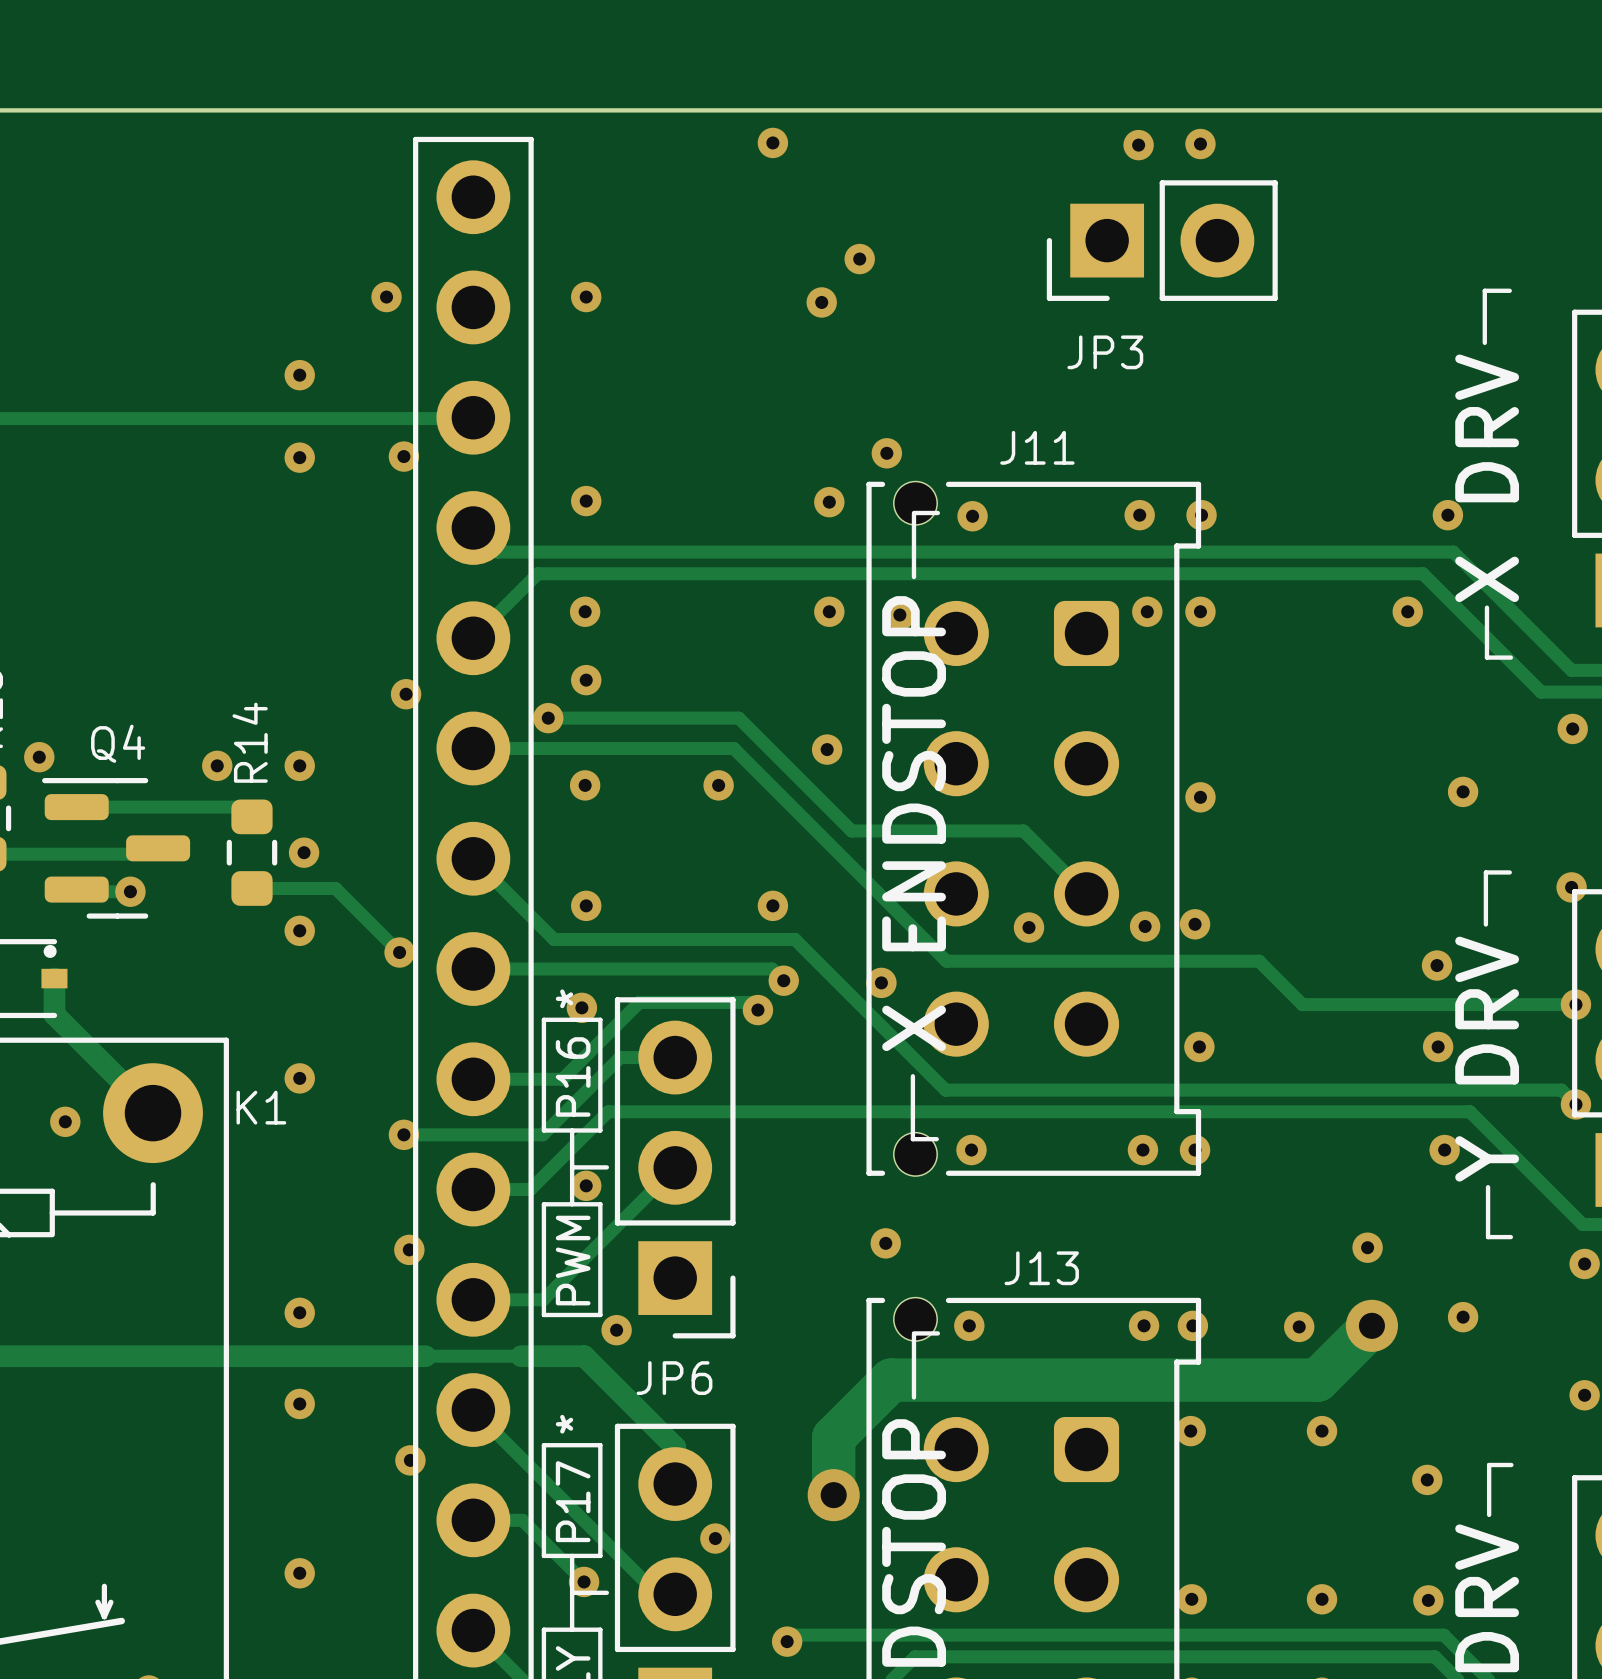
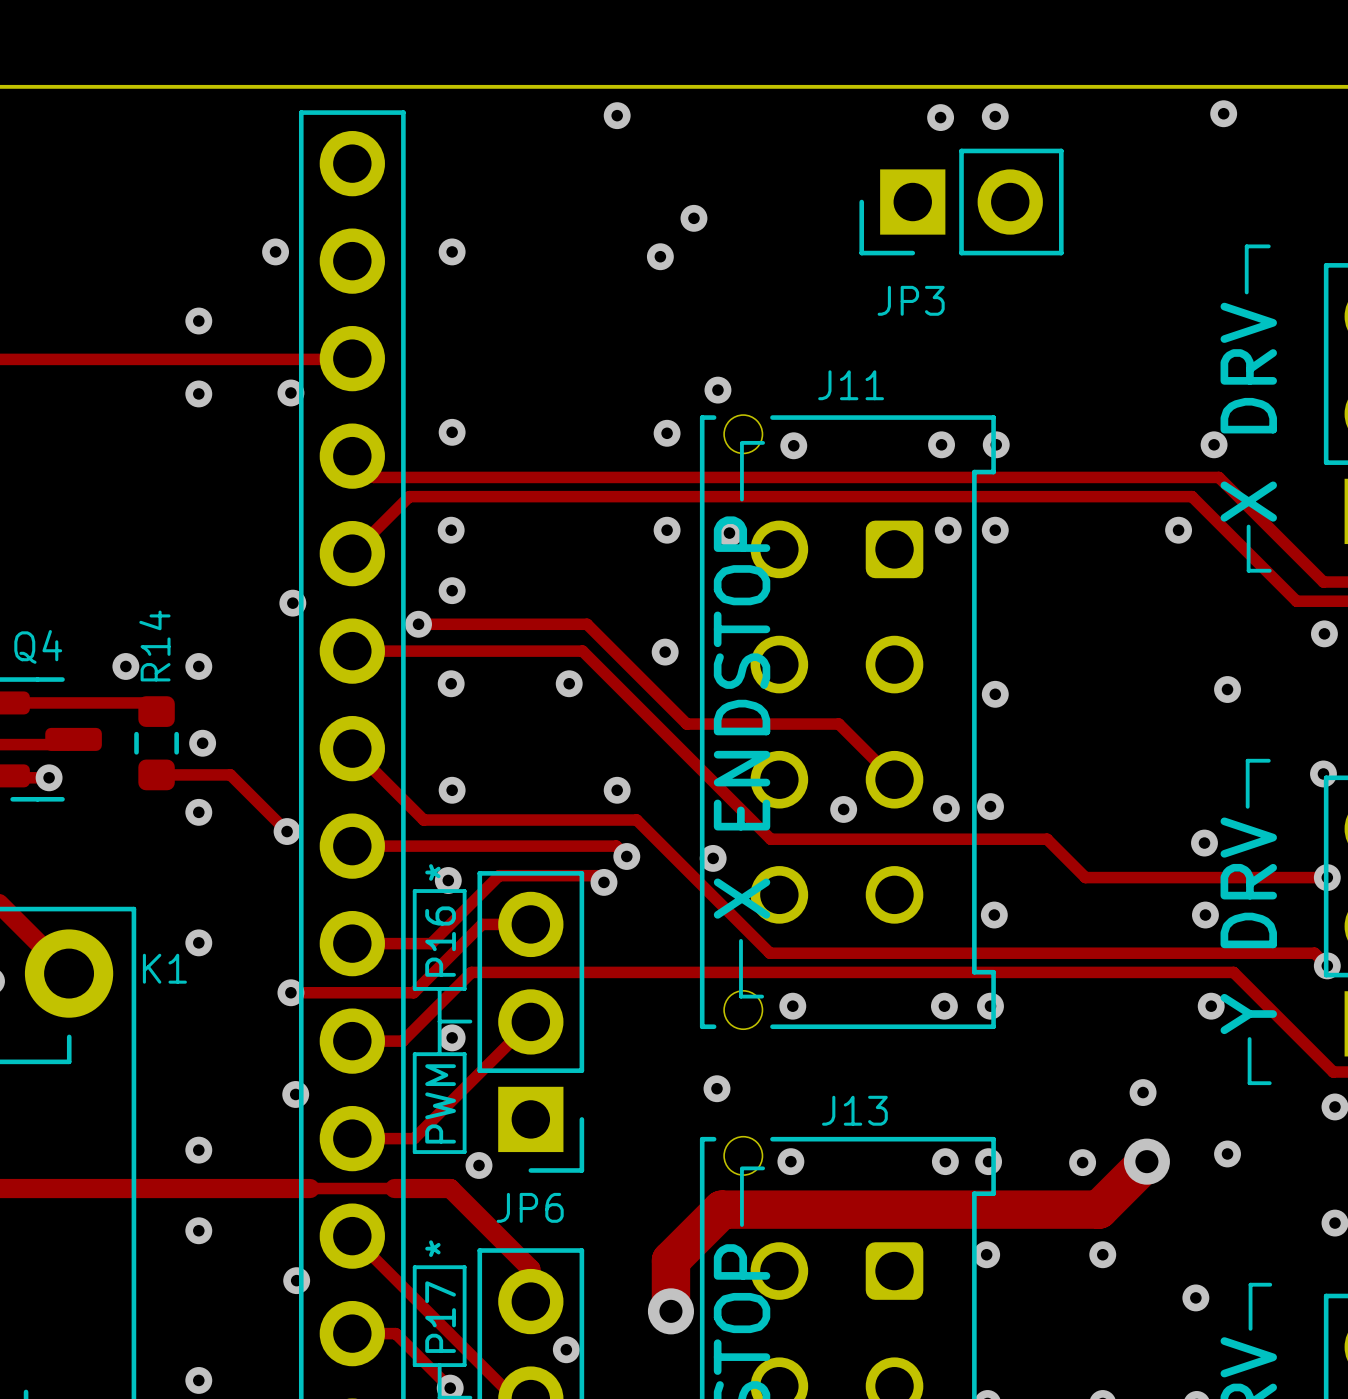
via: none -> (1223, 113)

